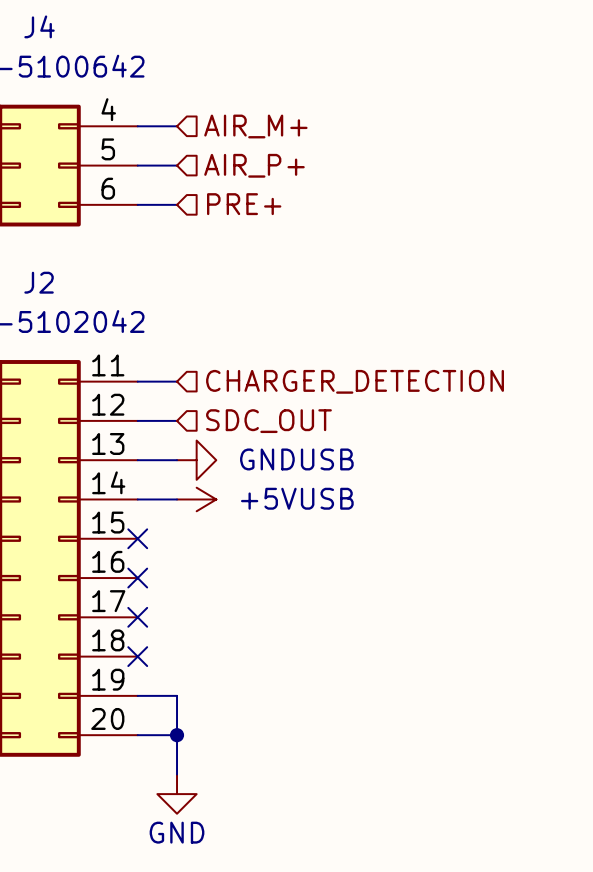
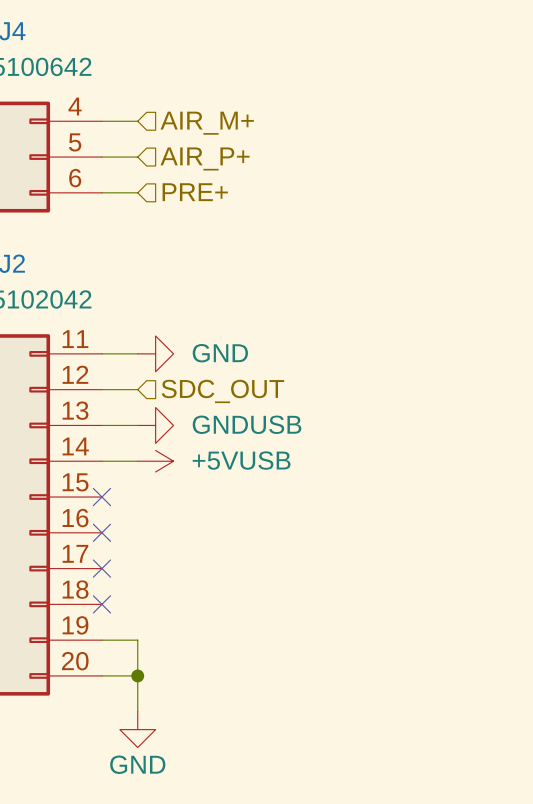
power symbol: none -> GND (155, 353)
hierarchical label: CHARGER_DETECTION (355, 381) -> none

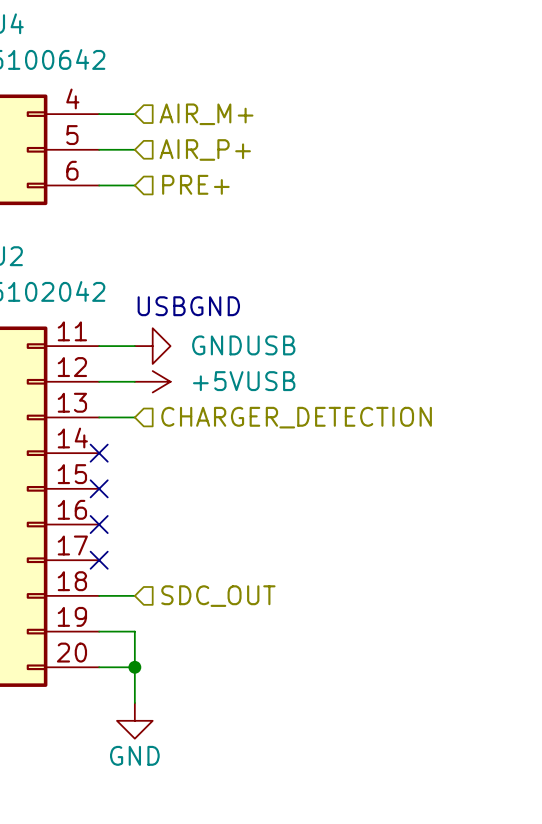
text: none -> USBGND (188, 306)
power symbol: GND (155, 353) -> GNDUSB (152, 346)
hierarchical label position: SDC_OUT (222, 391) -> SDC_OUT (218, 596)
power symbol: GNDUSB (155, 425) -> none
hierarchical label: none -> CHARGER_DETECTION (296, 417)
wire: (101, 461) (137, 461) -> (99, 595) (134, 595)
no-connect mark: none -> (99, 453)
power symbol position: +5VUSB (155, 461) -> +5VUSB (152, 381)
no-connect mark: (101, 604) -> none

